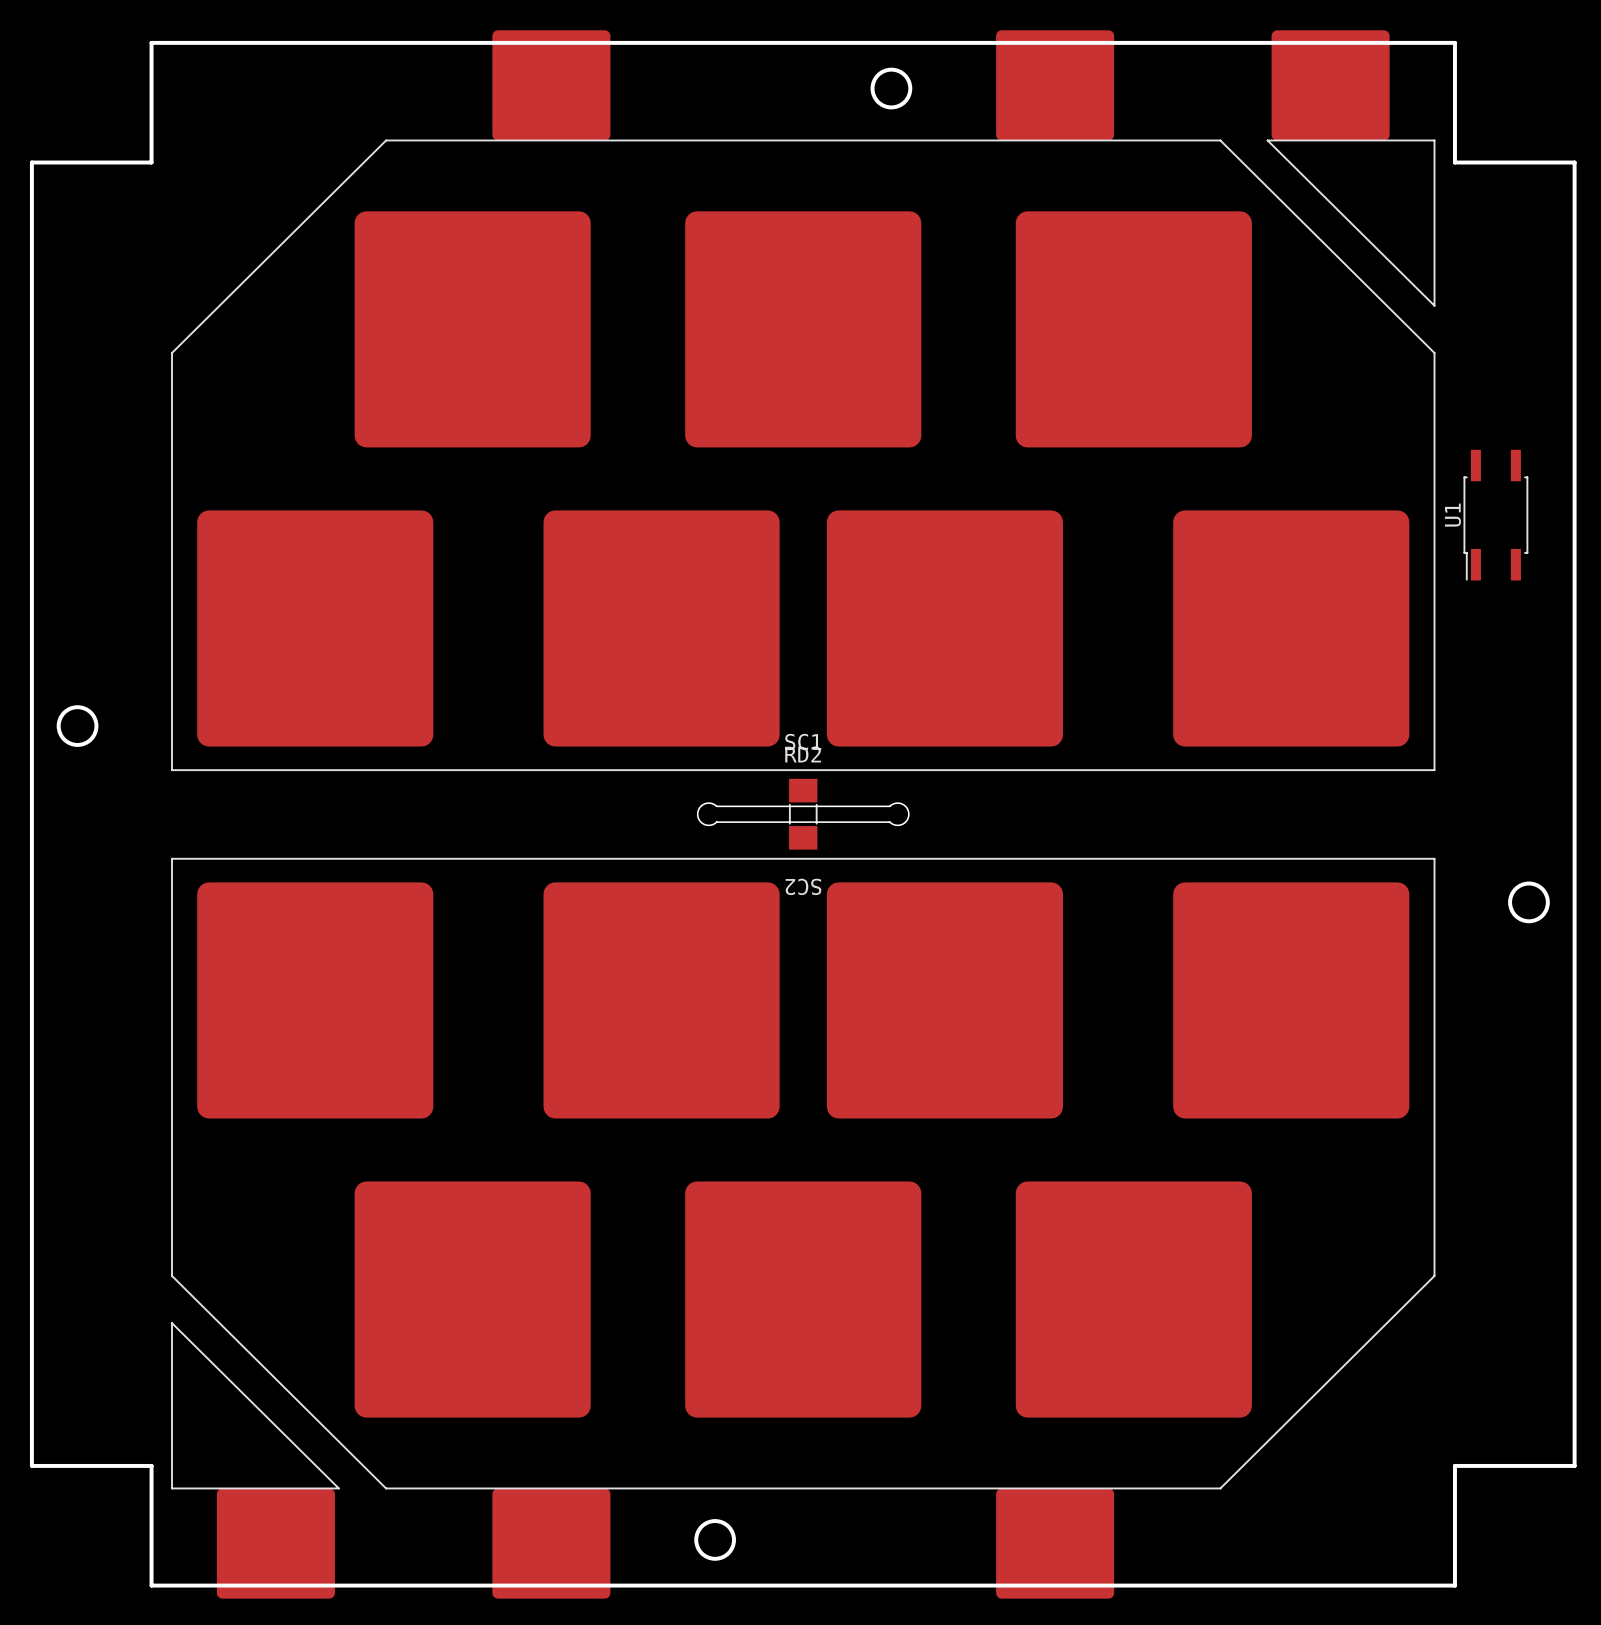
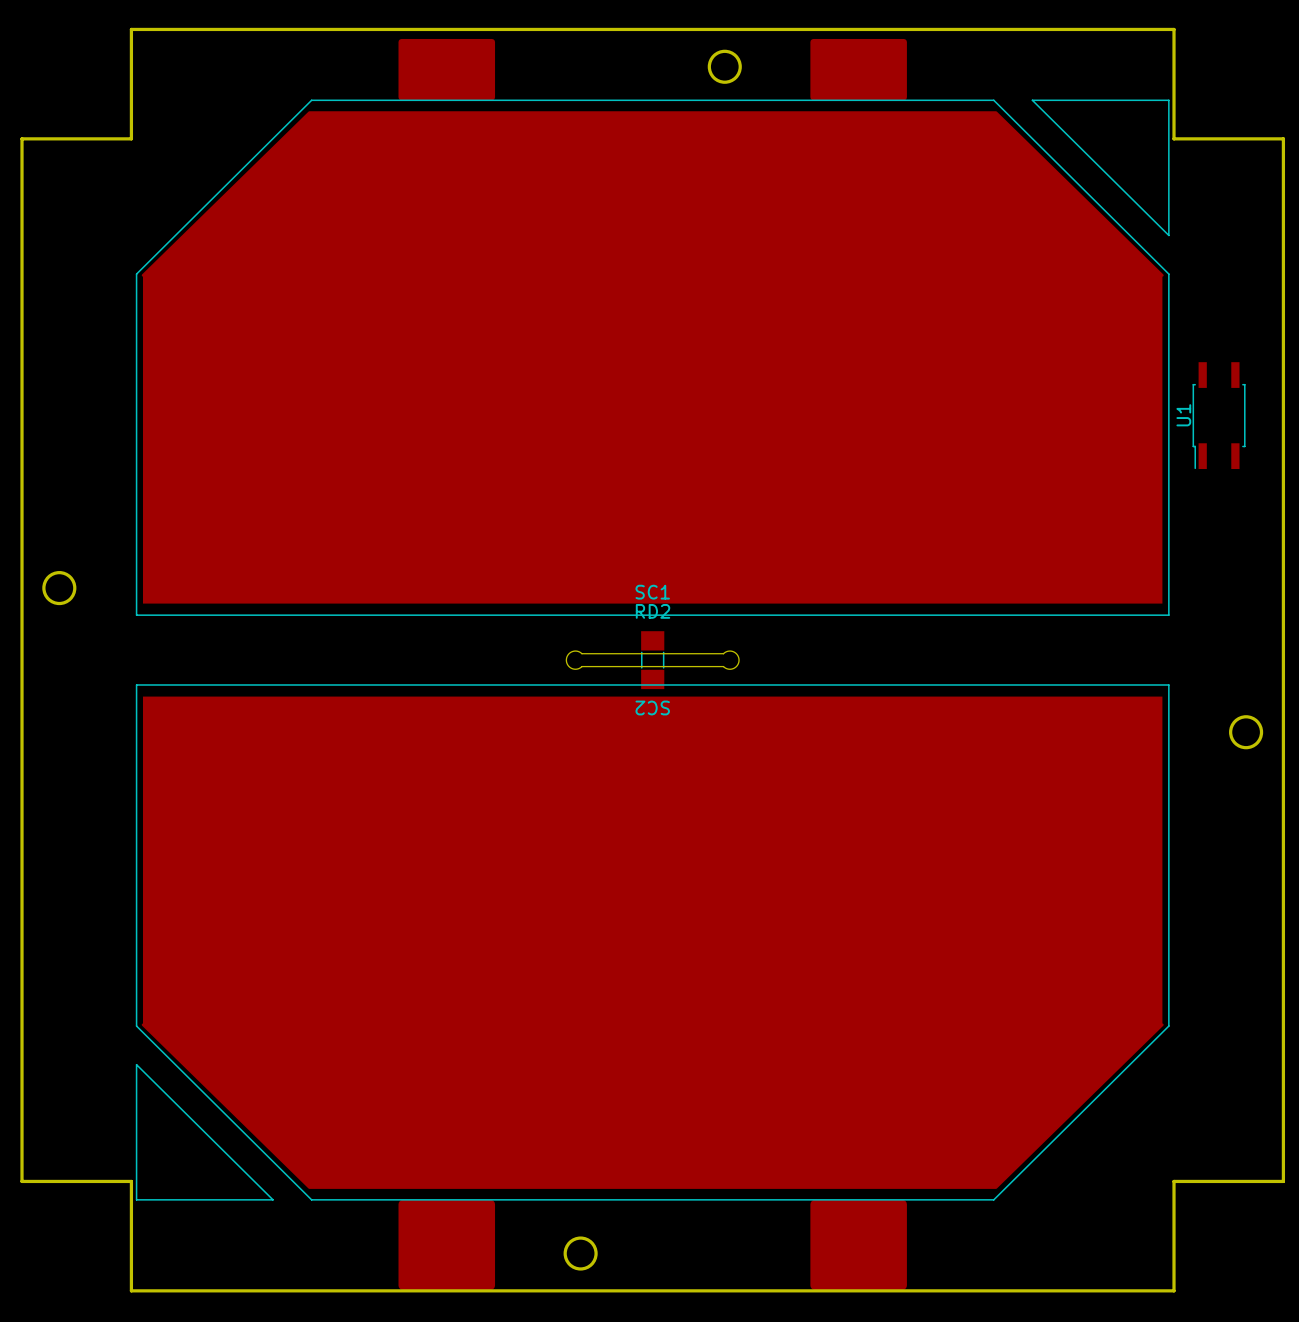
SC1 footprint: [171, 30, 1436, 772] -> [135, 38, 1170, 616]
drawing shape: [29, 40, 1577, 1588] -> [20, 27, 1286, 1293]
SC2 footprint: [171, 857, 1436, 1599] -> [135, 684, 1170, 1290]

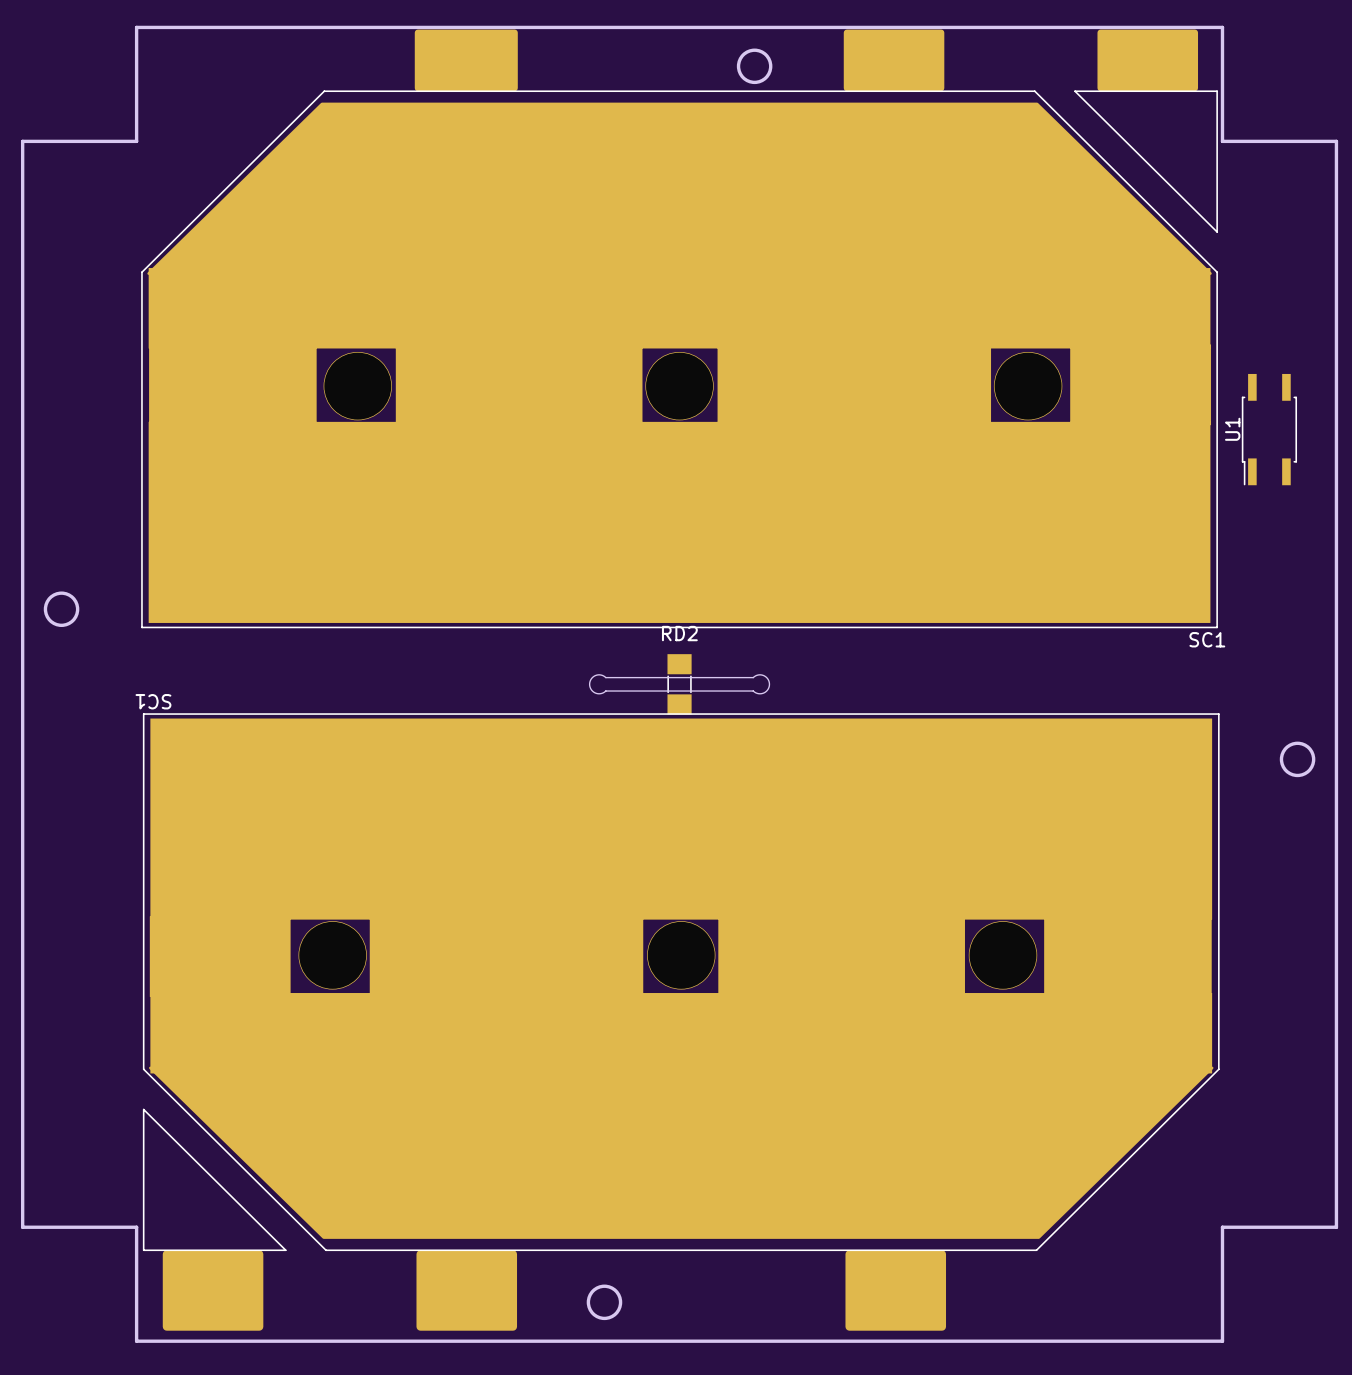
SC1 footprint: [135, 38, 1170, 616] -> [141, 29, 1218, 629]
SC1 name position: SC1 (652, 592) -> SC1 (1207, 639)
SC1: none -> (681, 1021)
SC2: (652, 987) -> none

